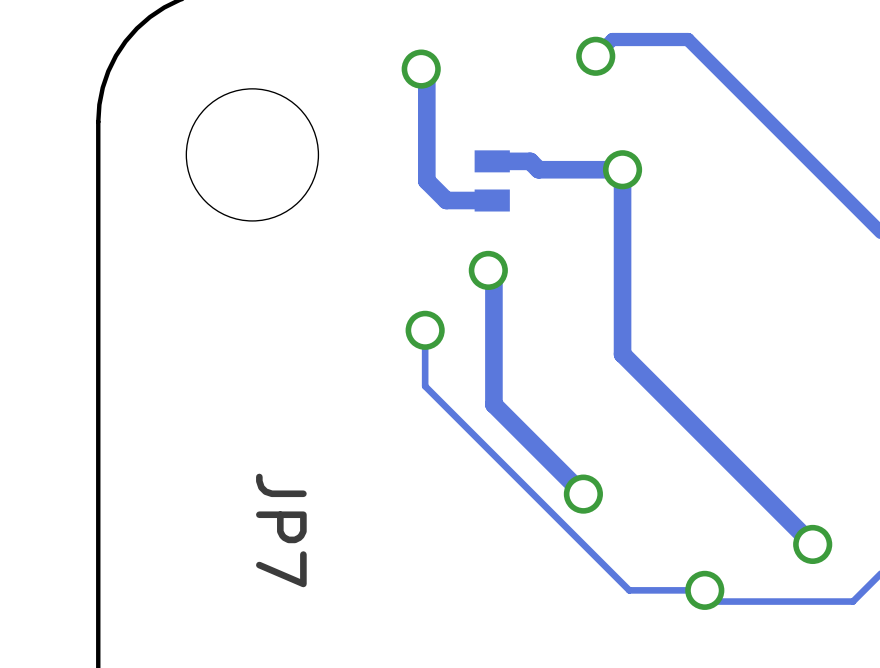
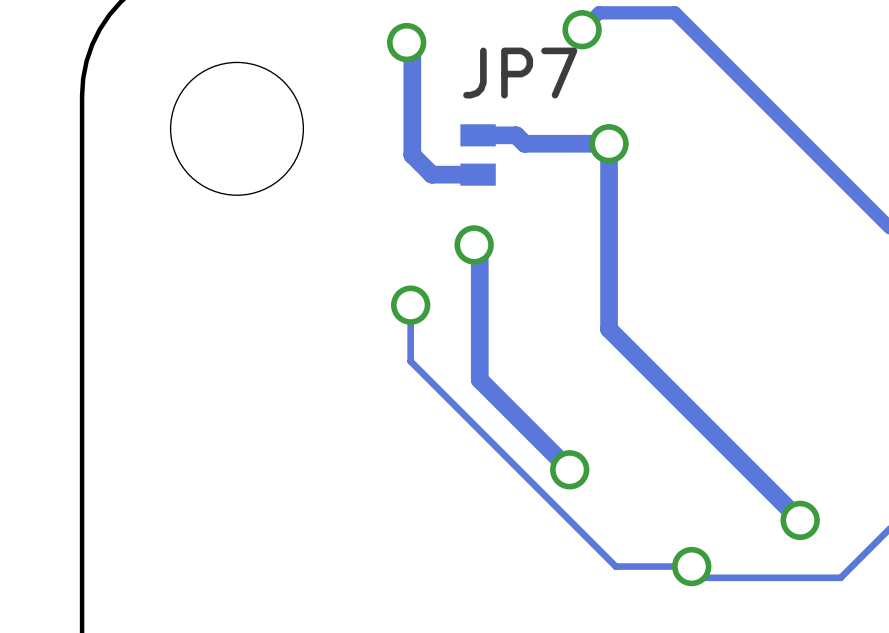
JP7 name rotation: 0° (281, 530) -> 90° counterclockwise (520, 73)
JP7 name position: JP7 (281, 530) -> JP7 (520, 73)

